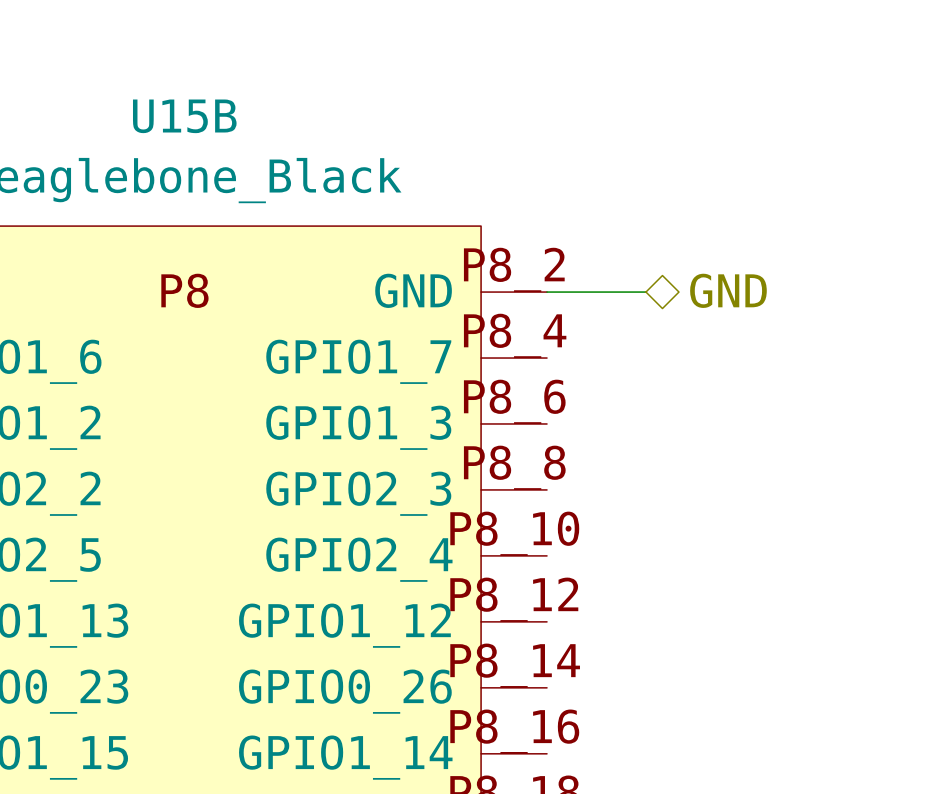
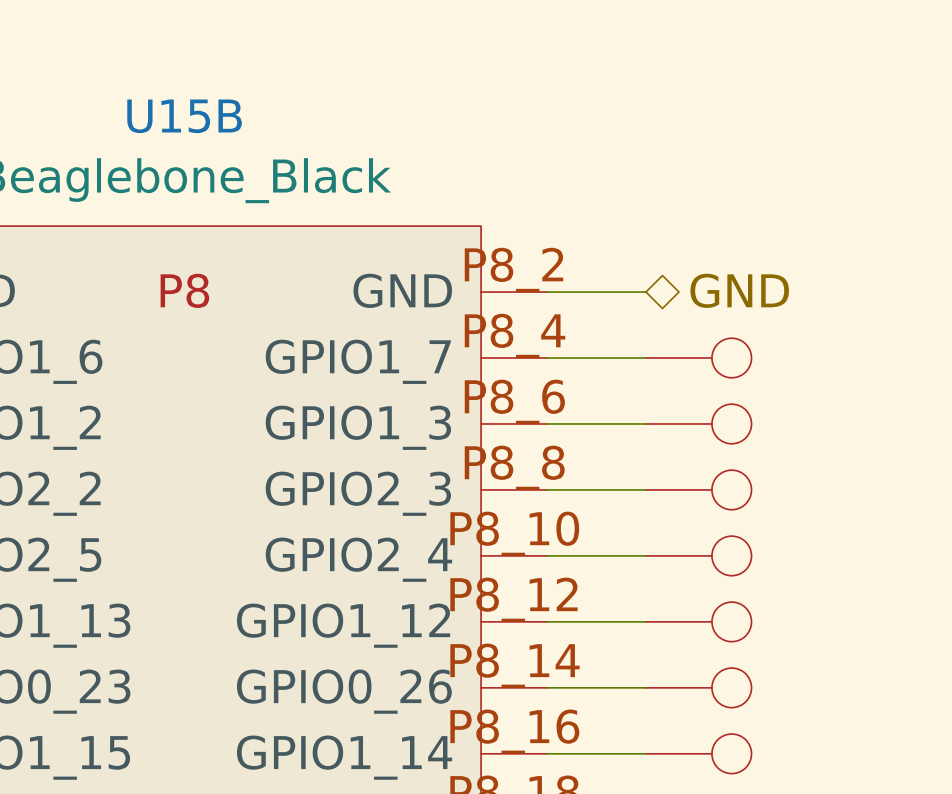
wire: none -> (547, 358) (645, 358)
part: none -> (698, 358)
wire: none -> (547, 423) (645, 423)
part: none -> (698, 423)
wire: none -> (547, 489) (645, 489)
part: none -> (698, 489)
wire: none -> (547, 555) (645, 555)
part: none -> (698, 555)
wire: none -> (547, 621) (645, 621)
part: none -> (698, 621)
wire: none -> (547, 687) (645, 687)
part: none -> (698, 687)
wire: none -> (547, 753) (645, 753)
part: none -> (698, 753)

